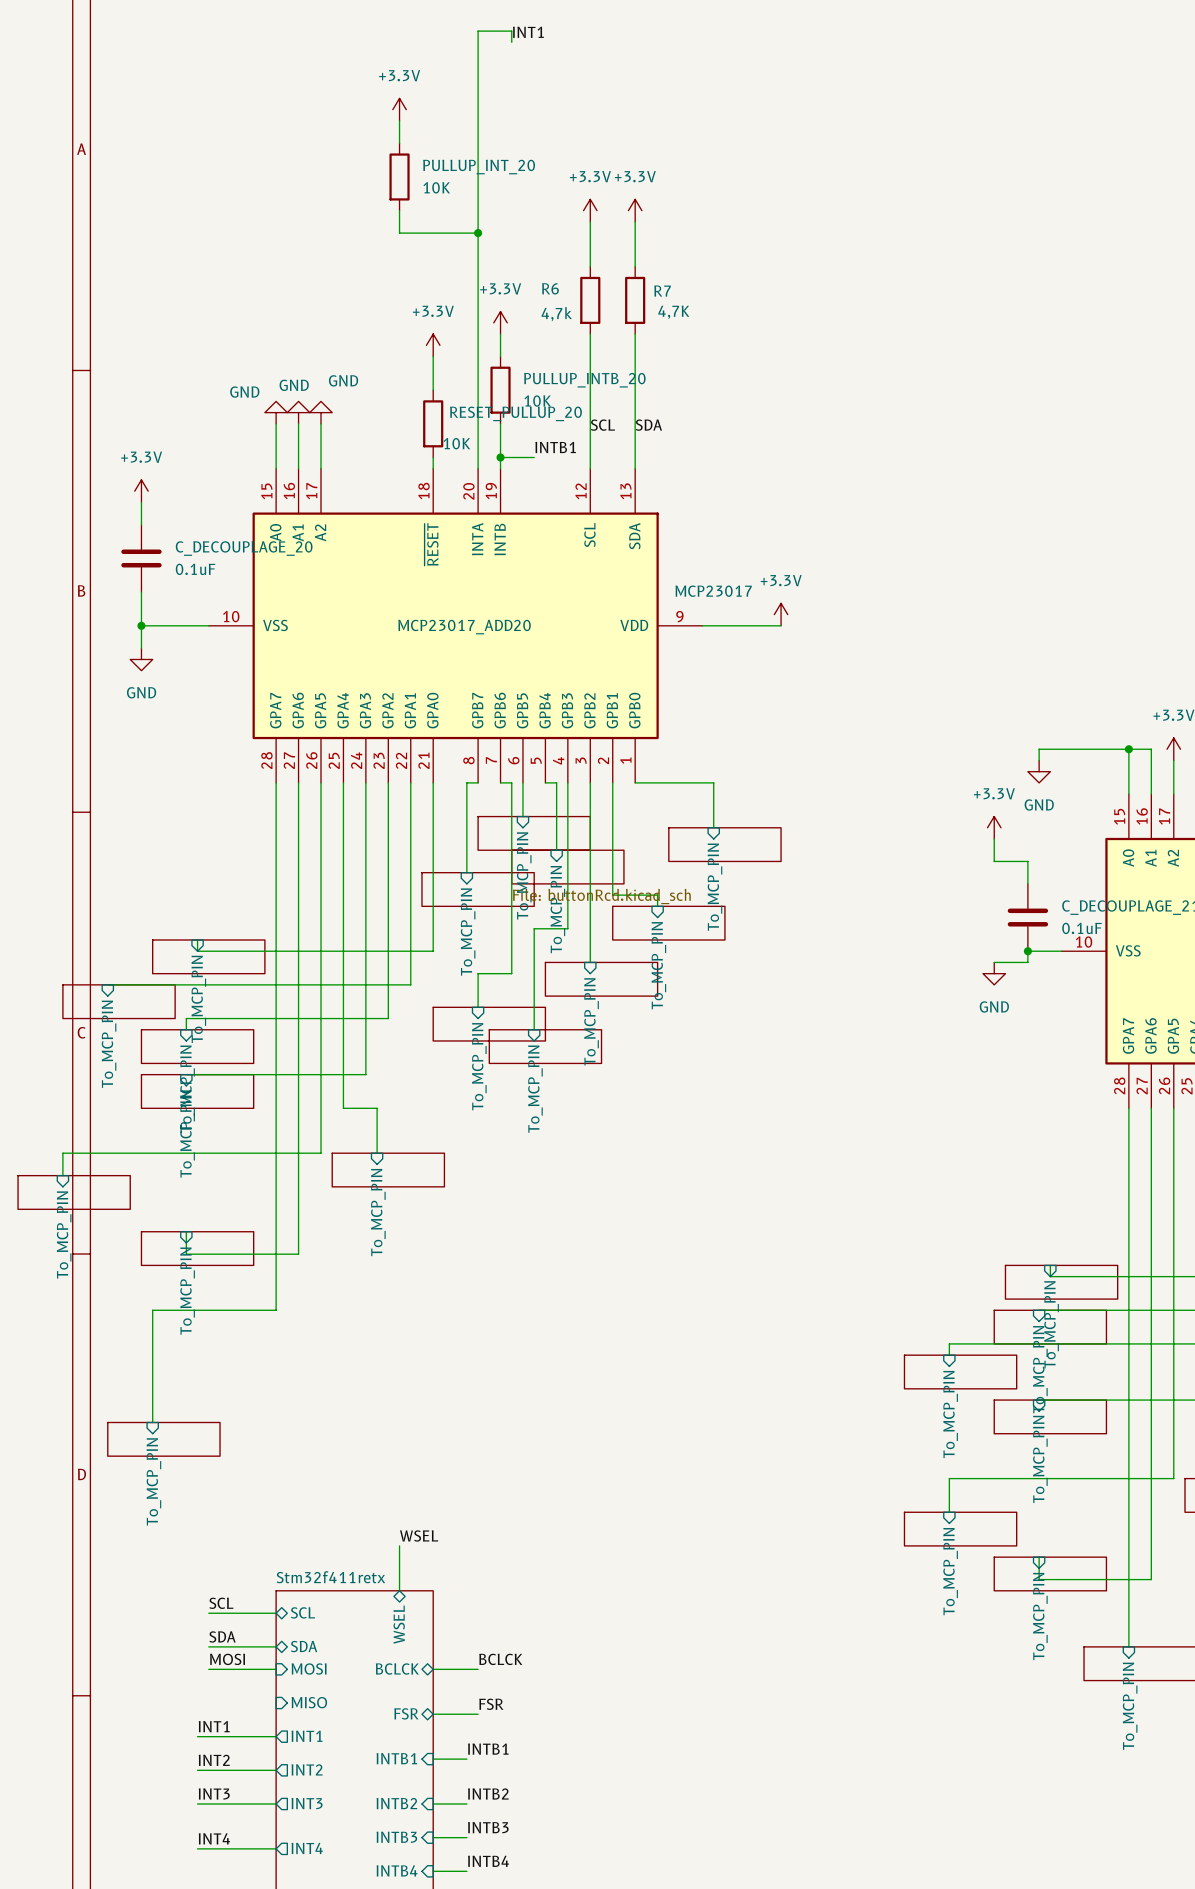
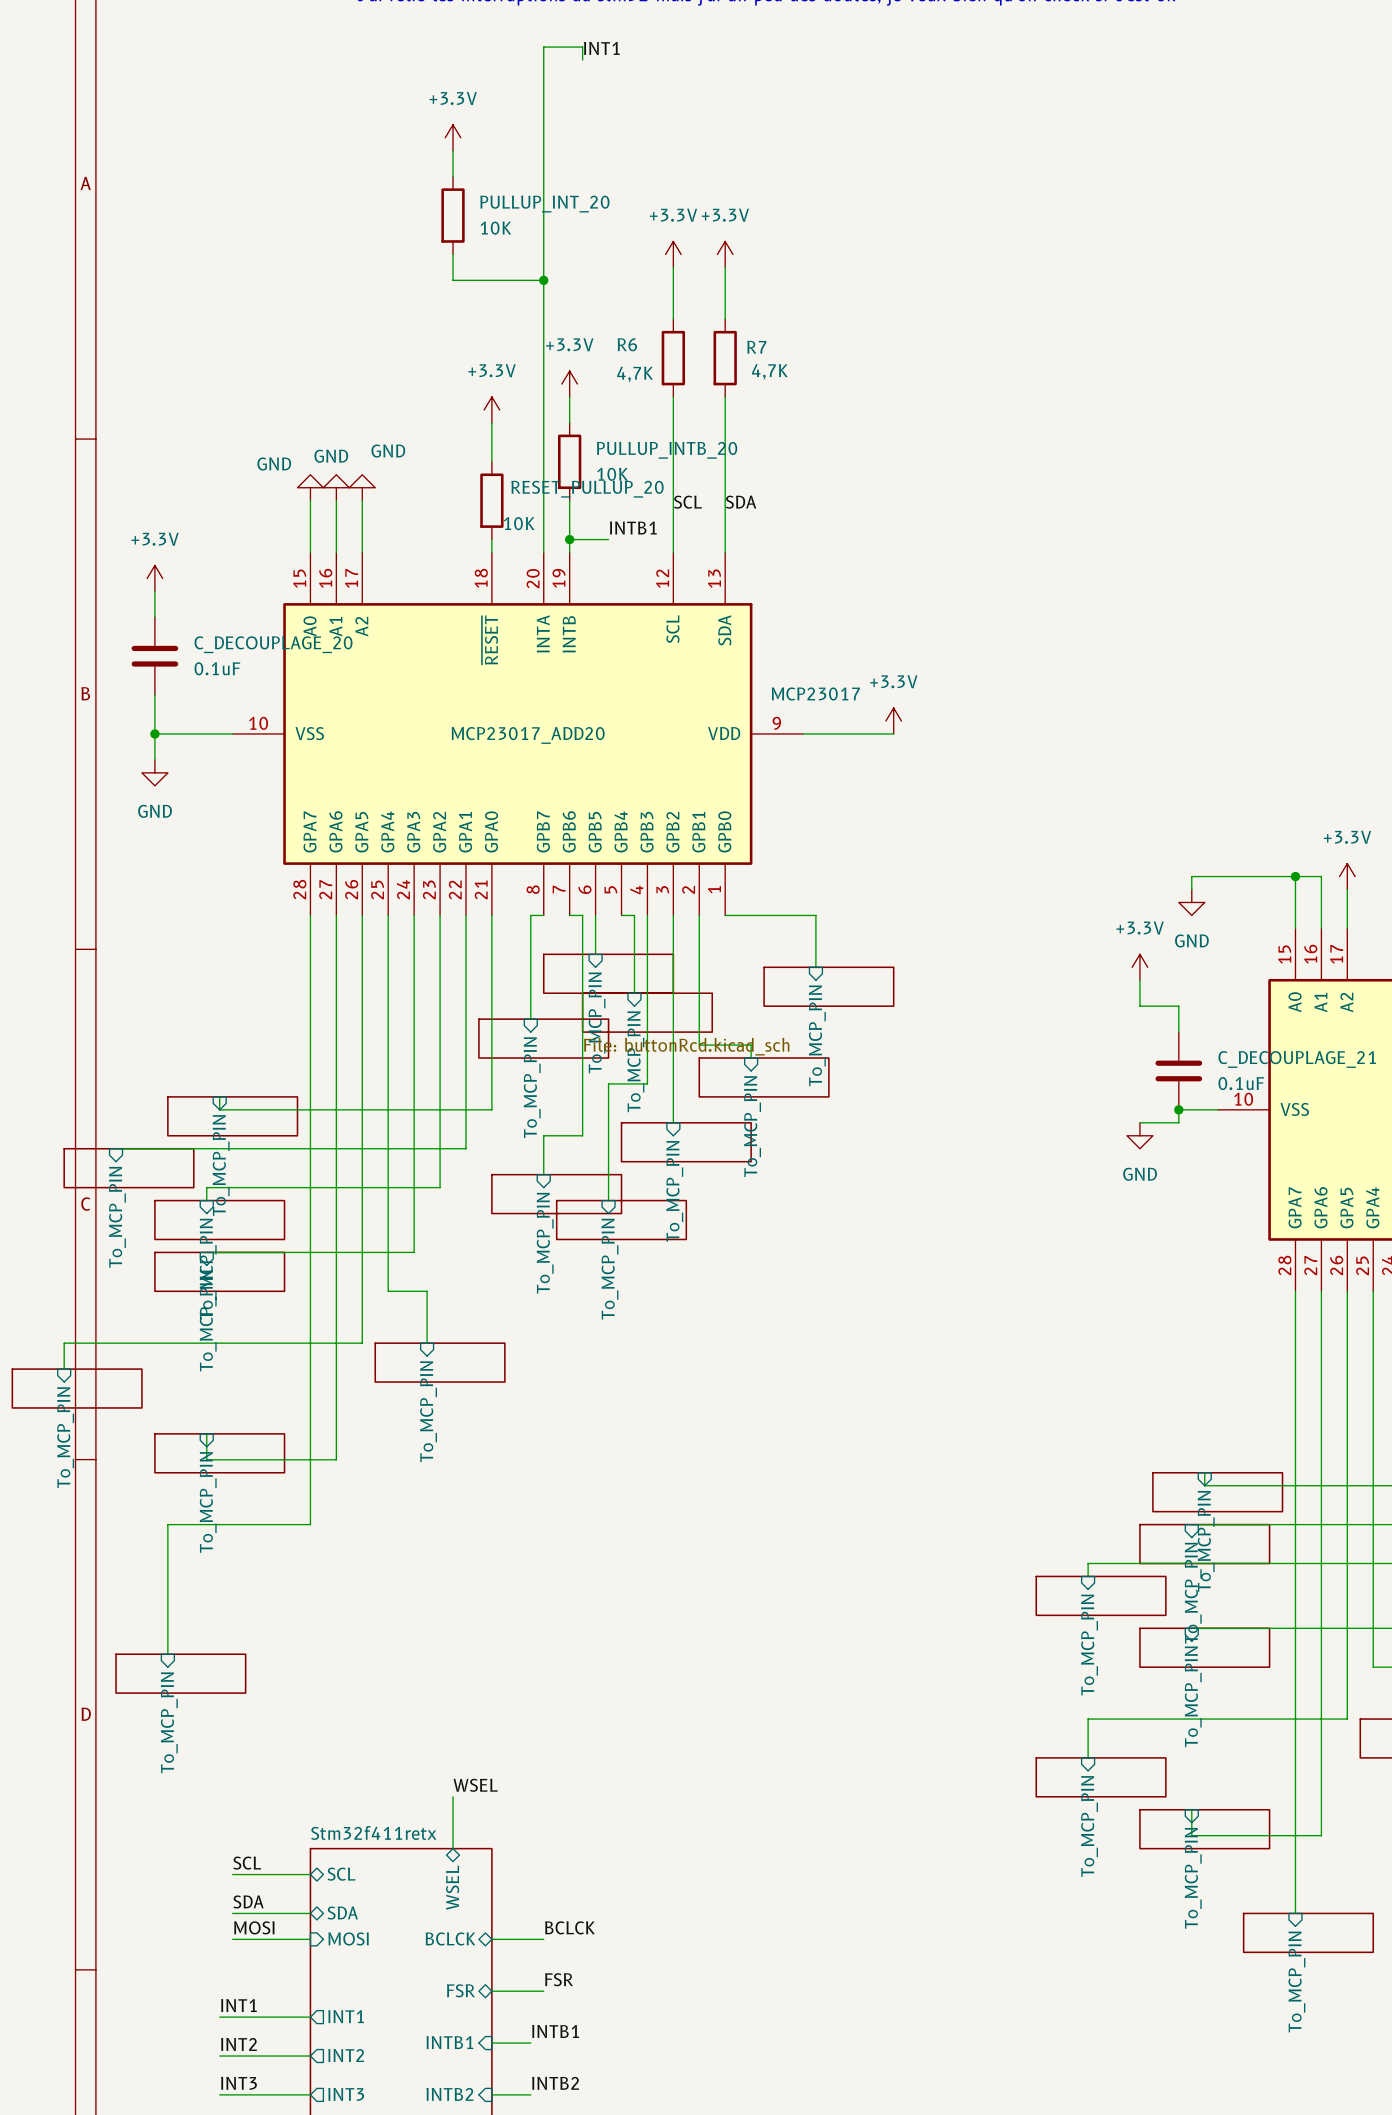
R6 value: 4,7k (556, 314) -> 4,7K (635, 374)
sheet pin: MISO (309, 1702) -> none

